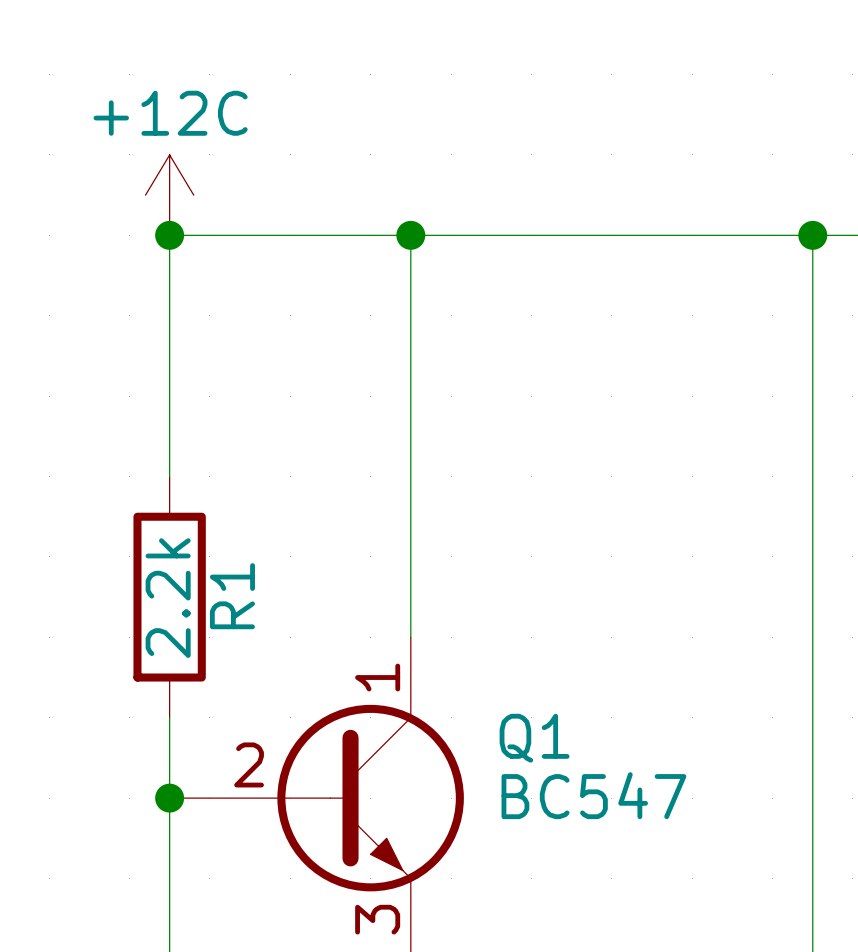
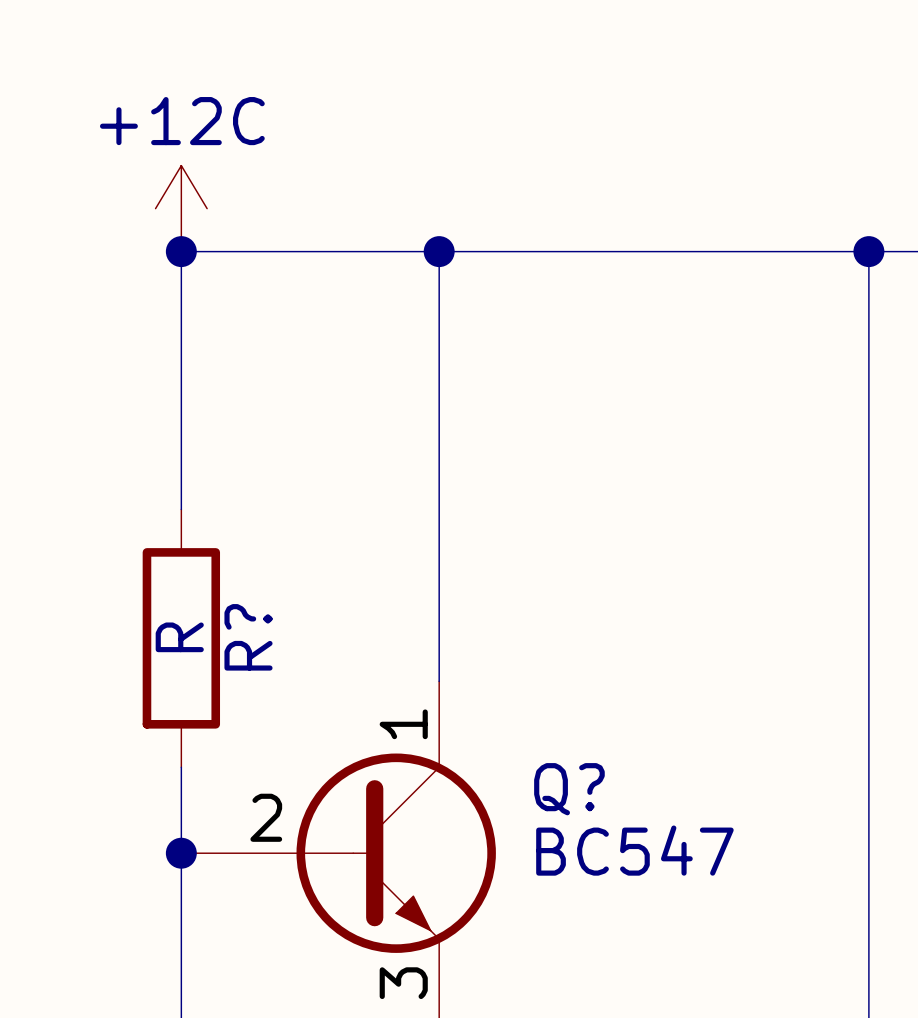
R1 name: R1 (232, 596) -> R? (248, 637)
R1 value: 2.2k (168, 598) -> R (179, 637)
Q1 name: Q1 (534, 738) -> Q? (569, 789)

